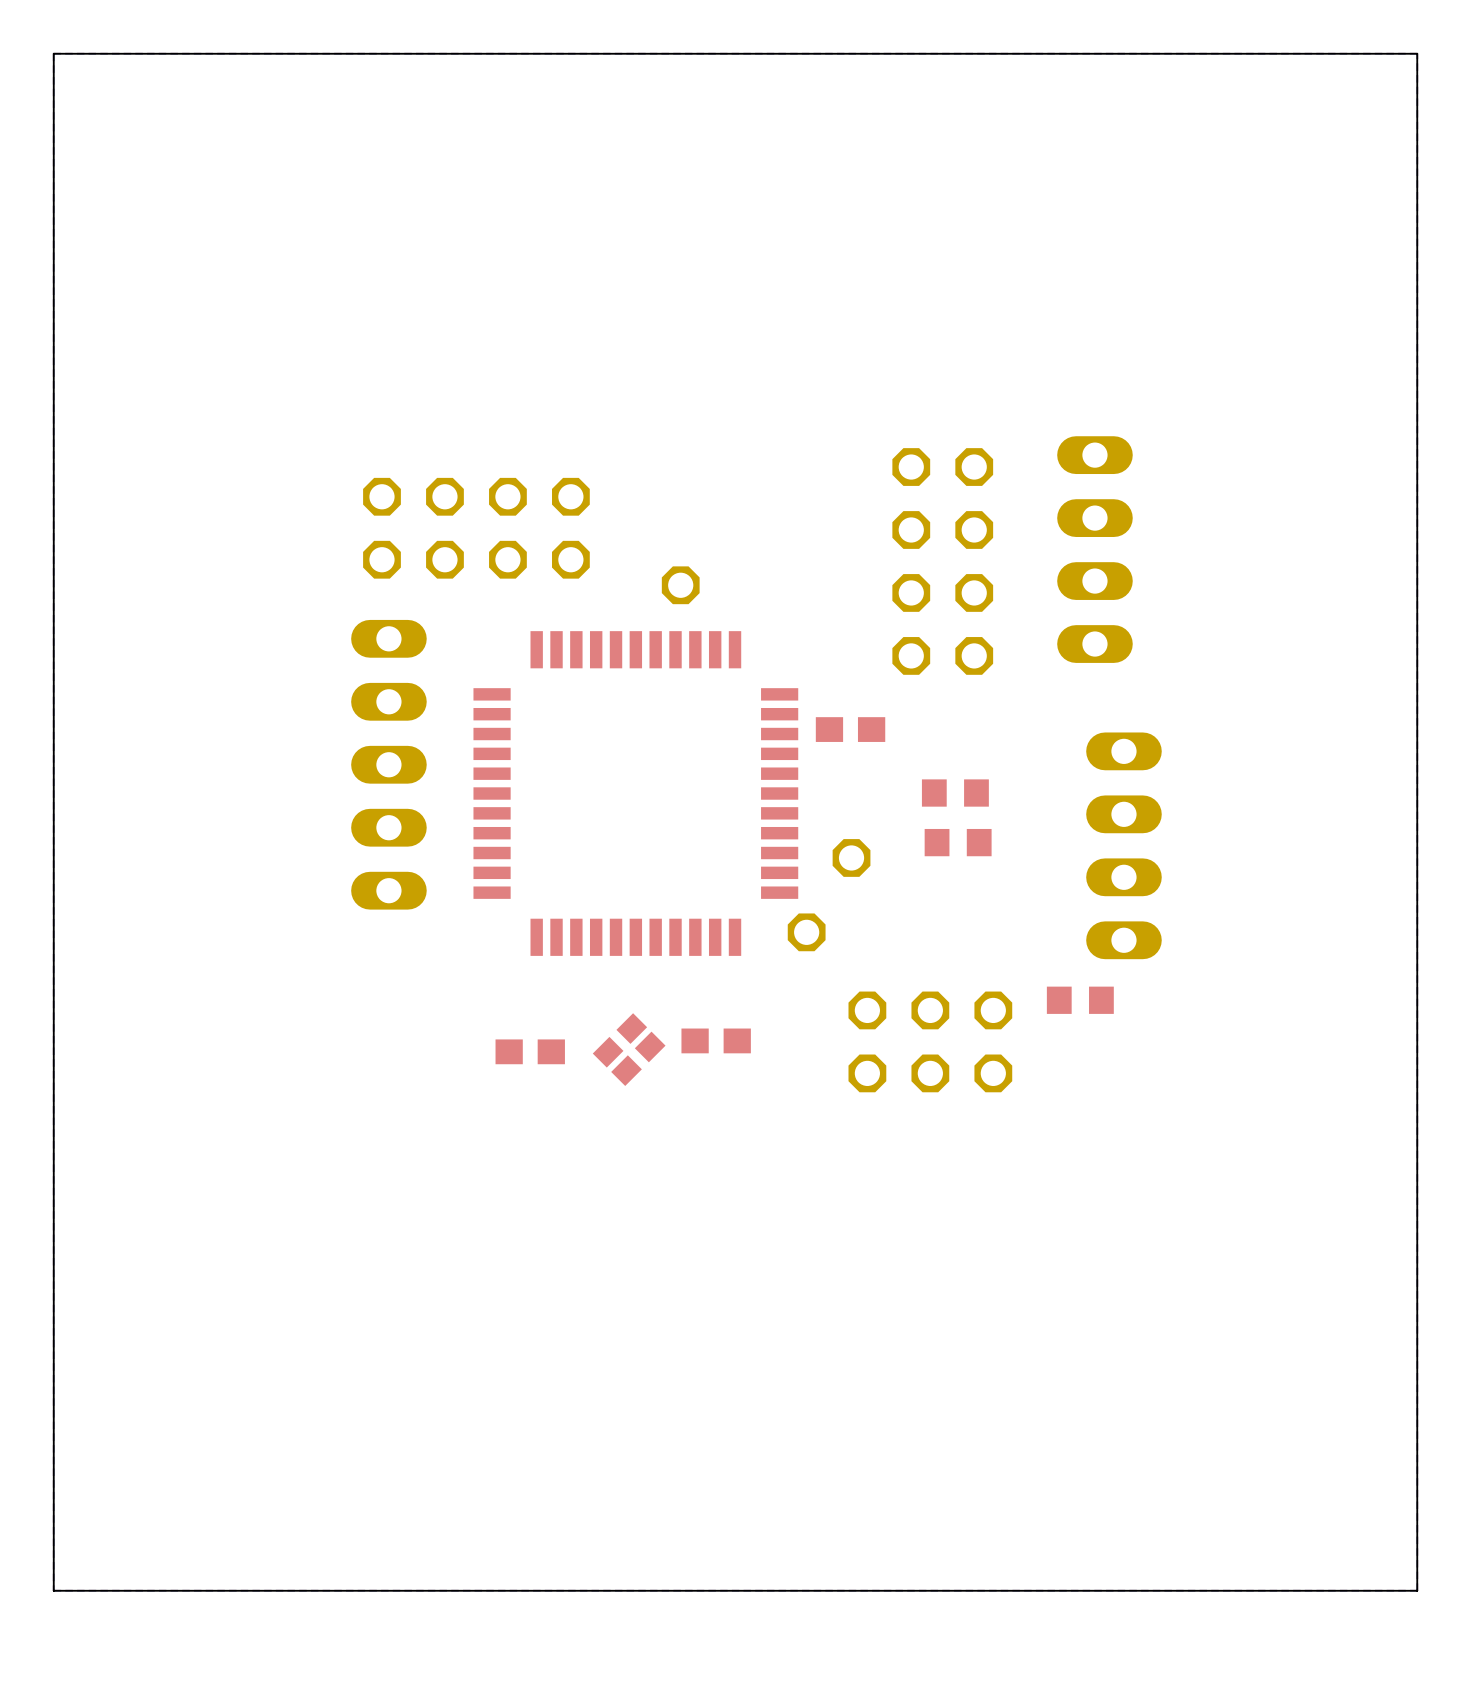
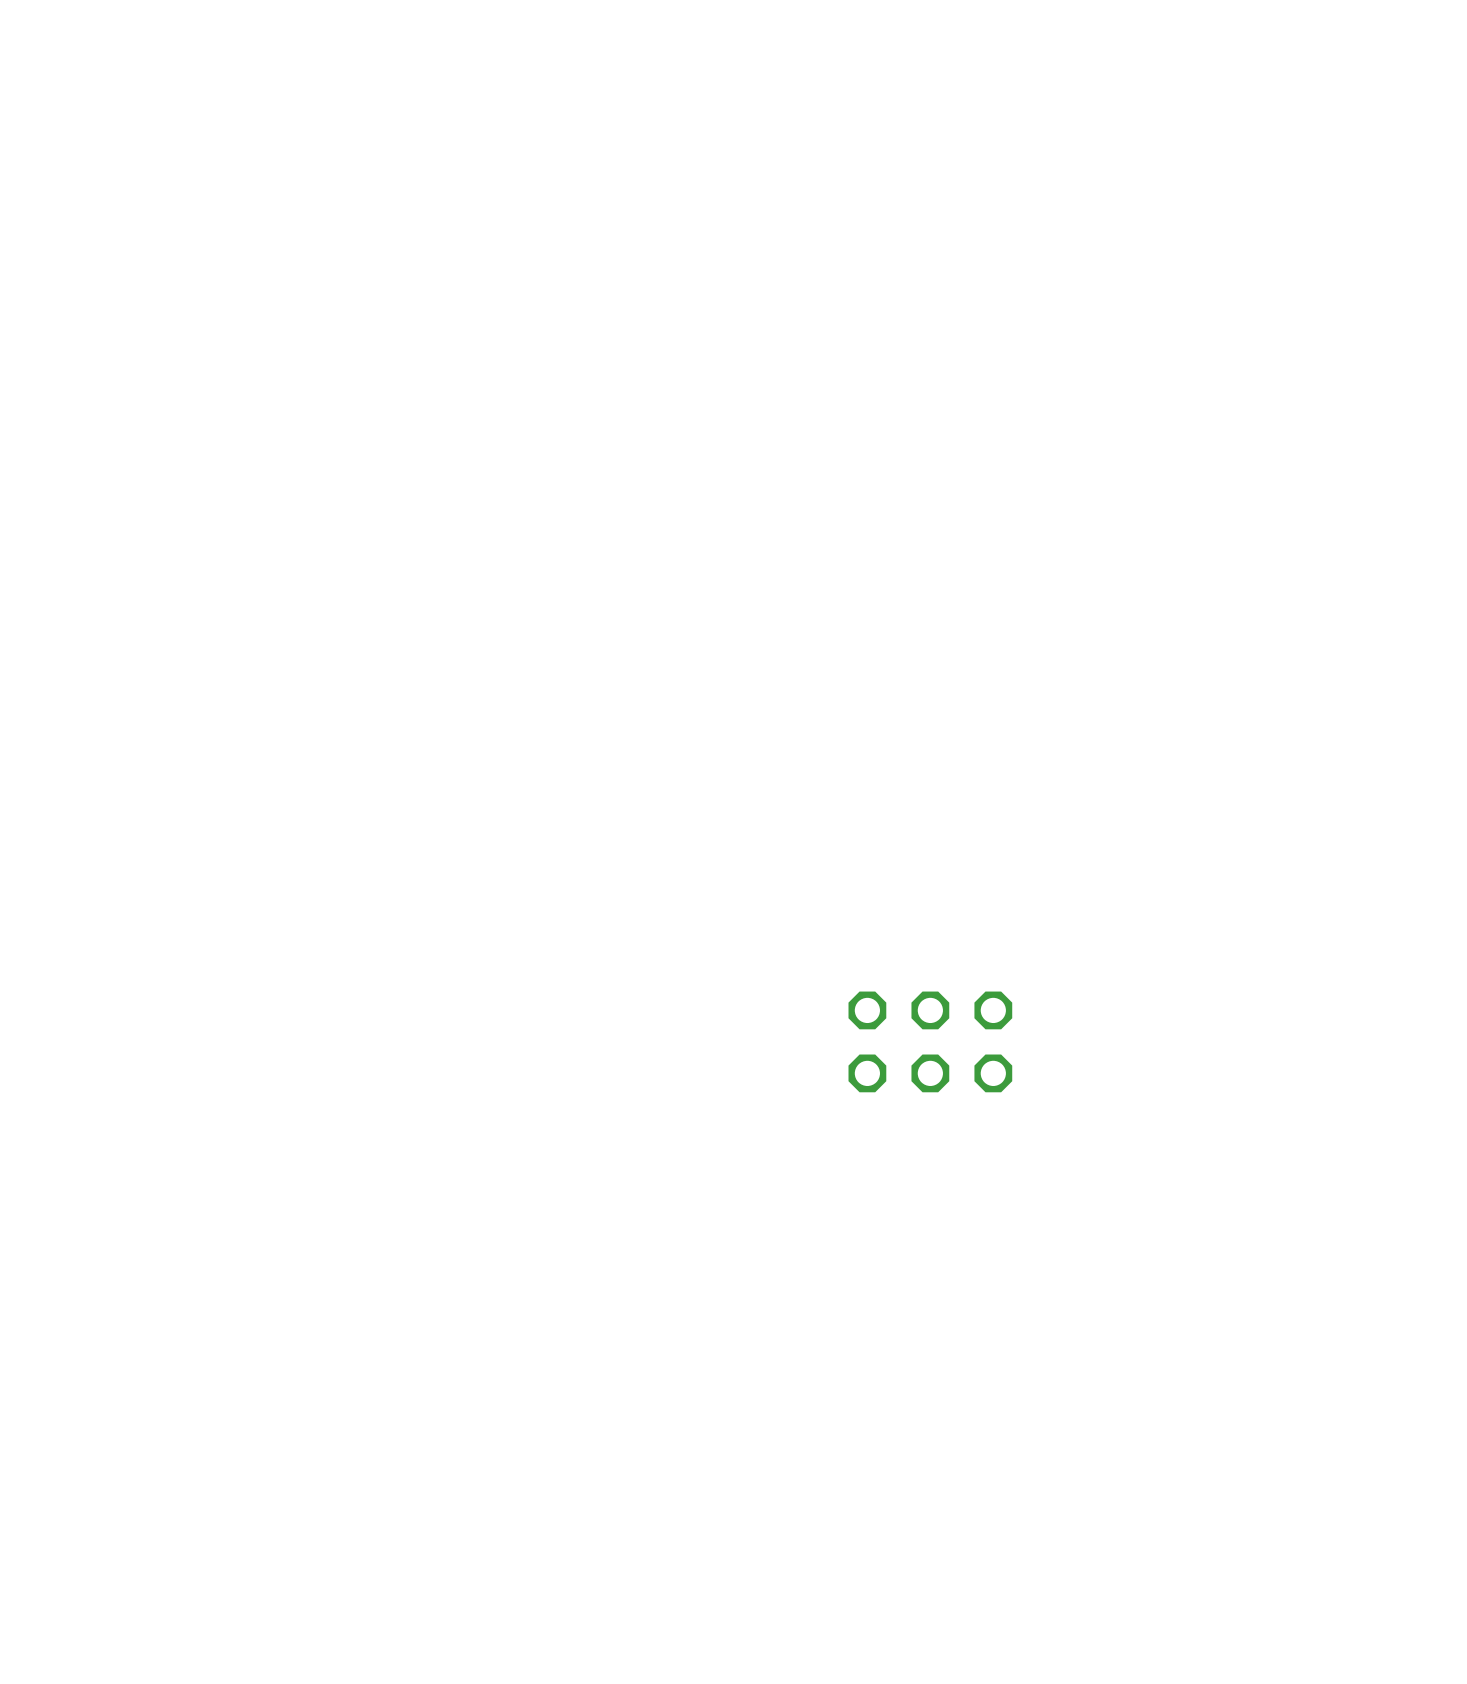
board edge: (1417, 53) (53, 53) (53, 1590) (1417, 1590) (1417, 53) -> none
part: (476, 528) -> none
part: (1094, 549) -> none
part: (942, 561) -> none
part: (680, 585) -> none
part: (850, 729) -> none
part: (388, 764) -> none
part: (635, 793) -> none
part: (955, 793) -> none
part: (958, 842) -> none
part: (1123, 845) -> none
part: (851, 857) -> none
part: (806, 932) -> none
part: (1080, 1000) -> none
part: (716, 1040) -> none
part: (629, 1049) -> none
part: (530, 1051) -> none

